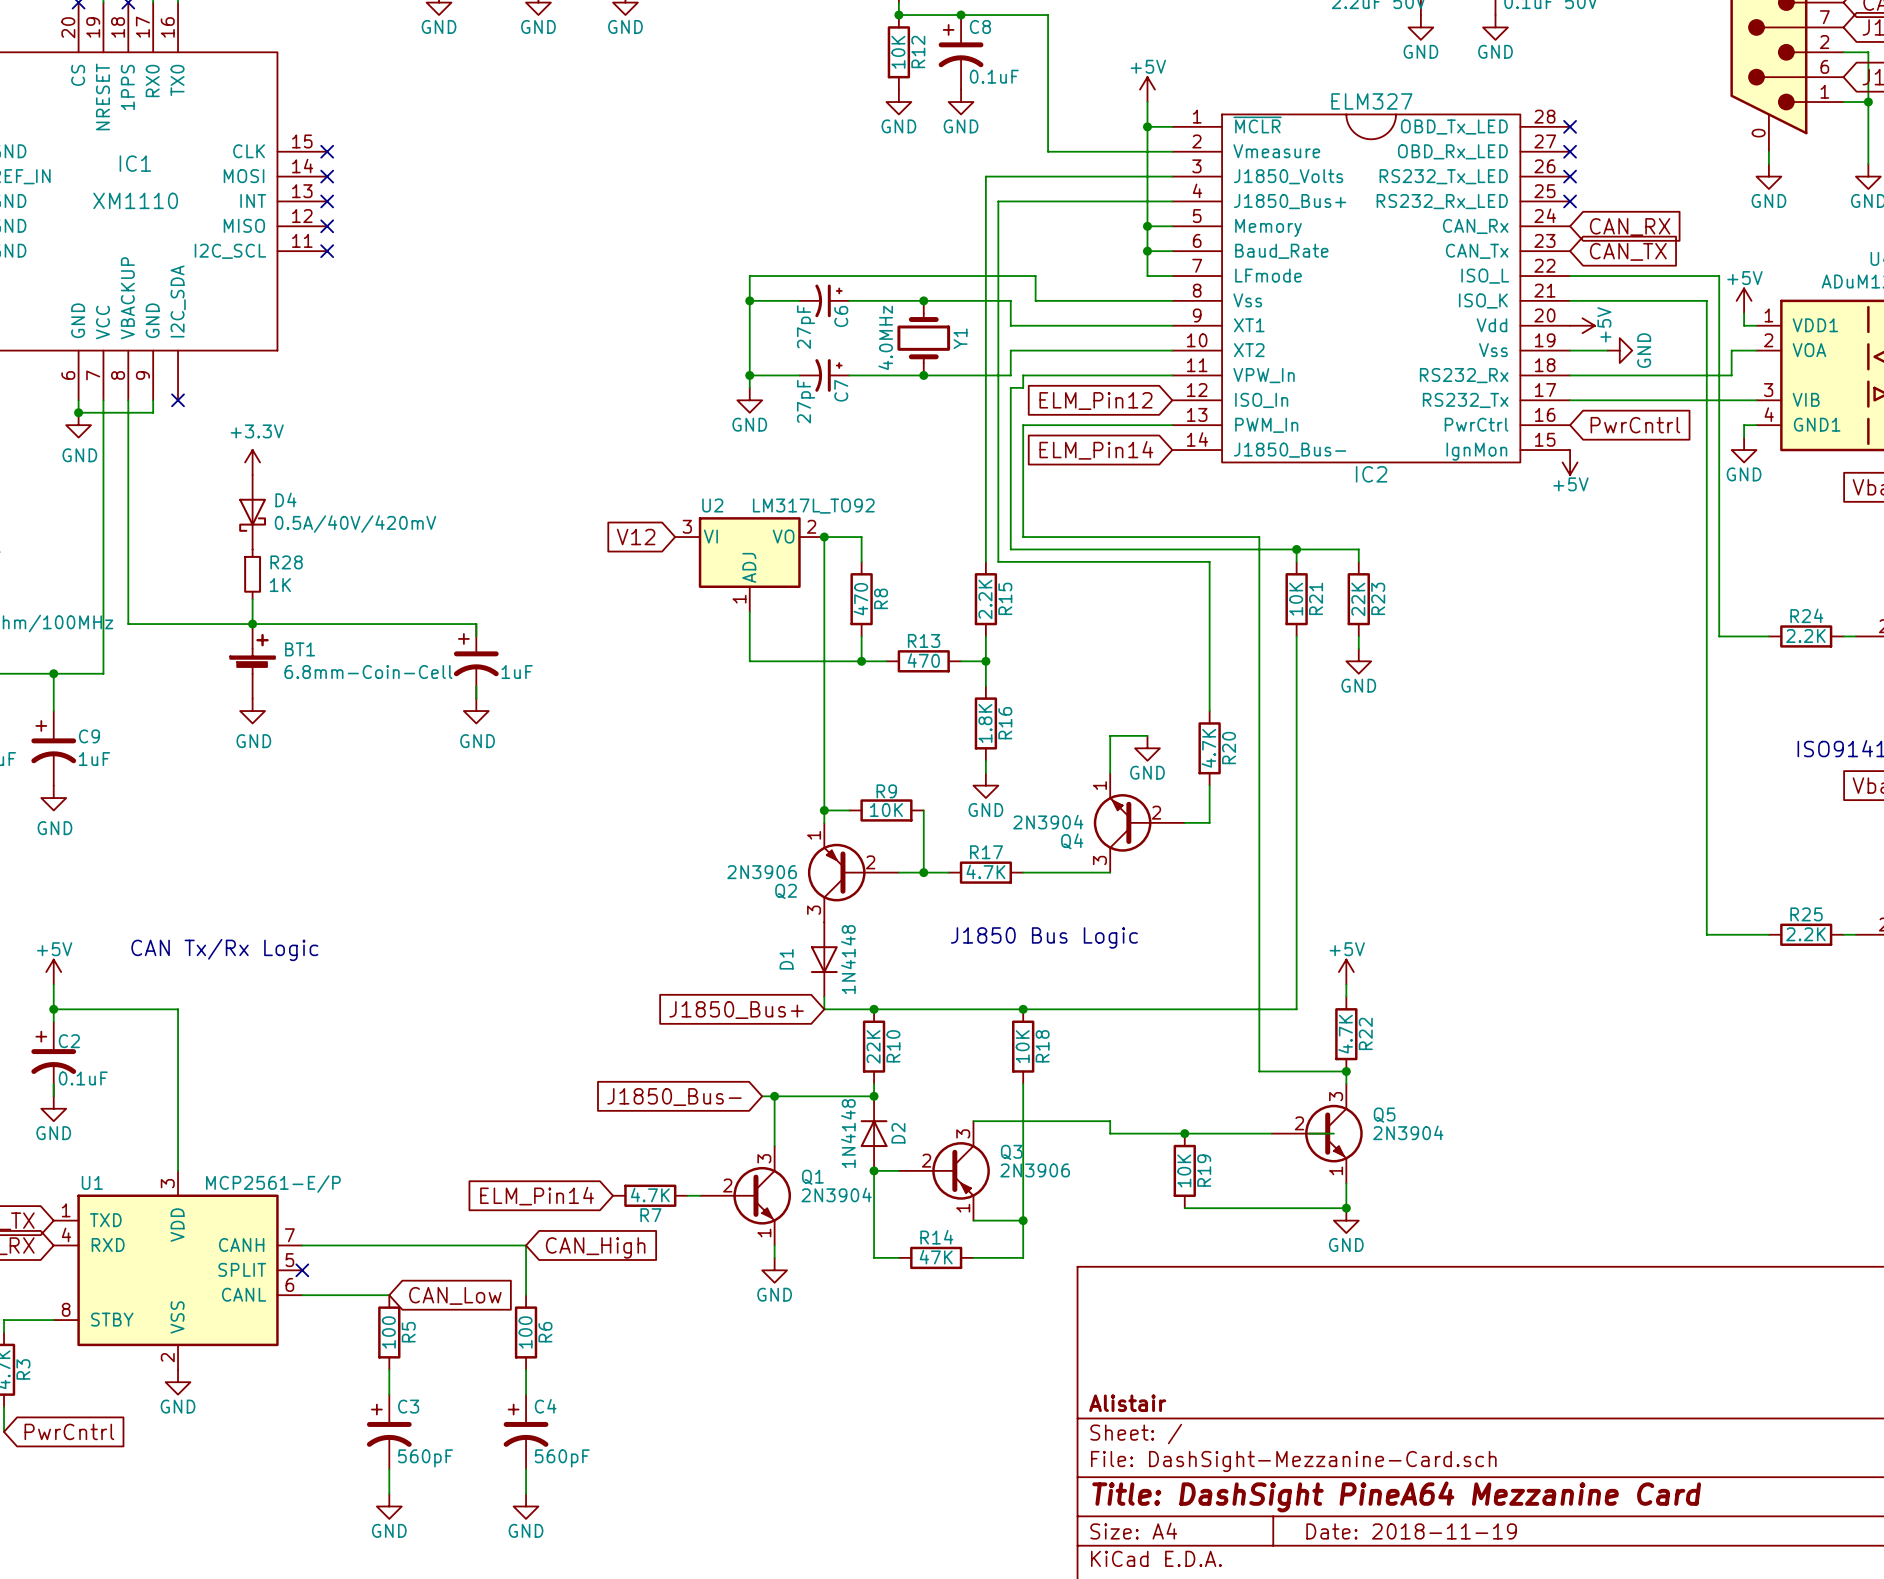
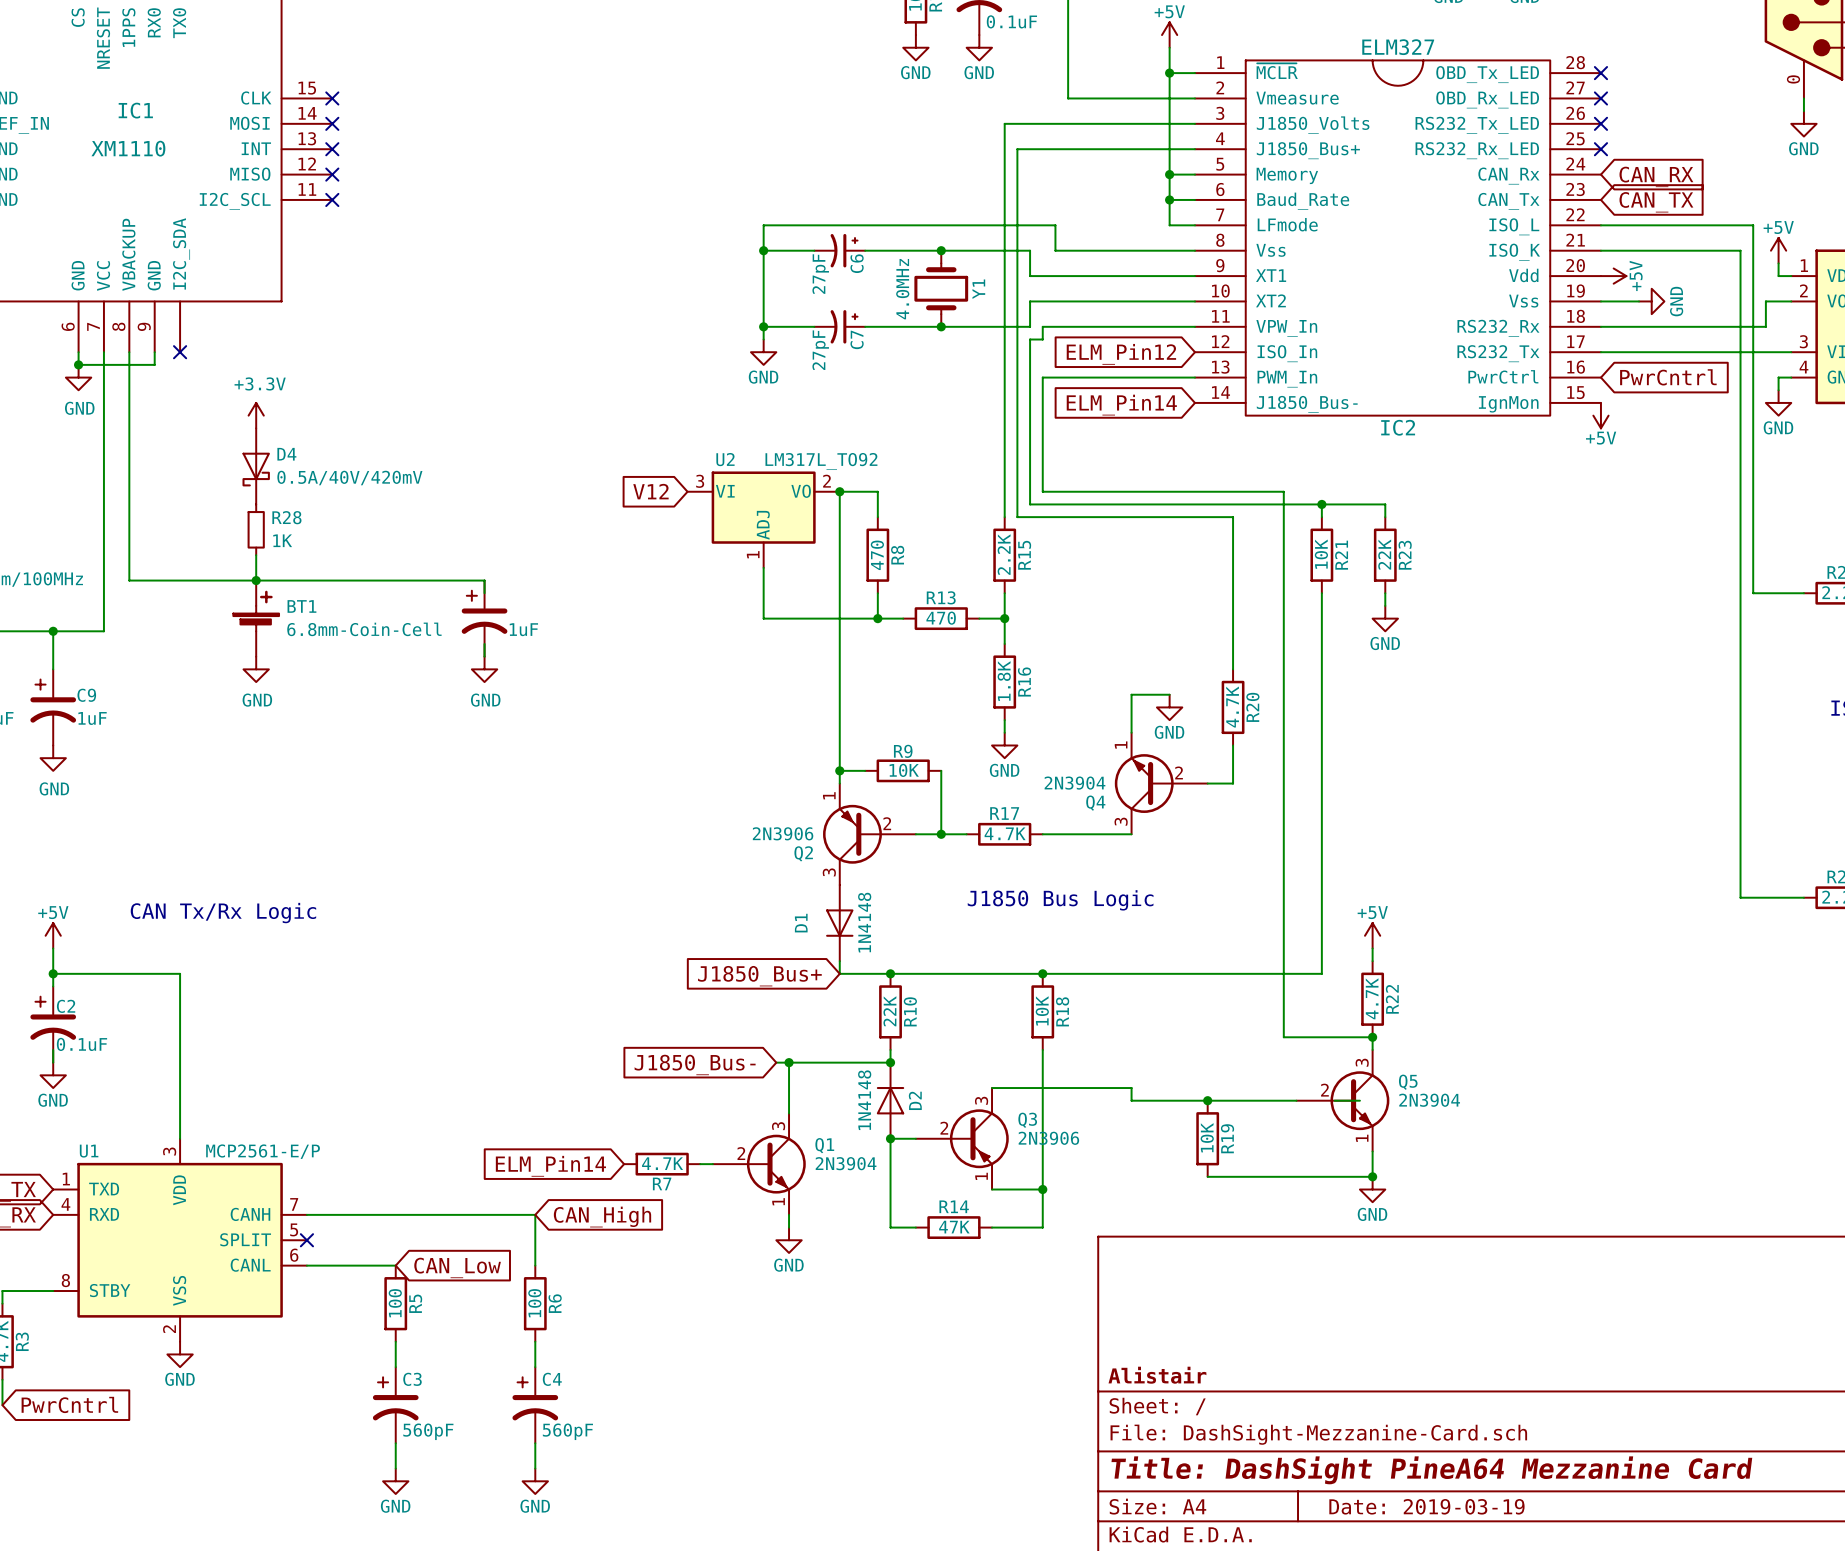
title block: Date: 2018-11-19 (1411, 1531) -> Date: 2019-03-19 (1426, 1506)

